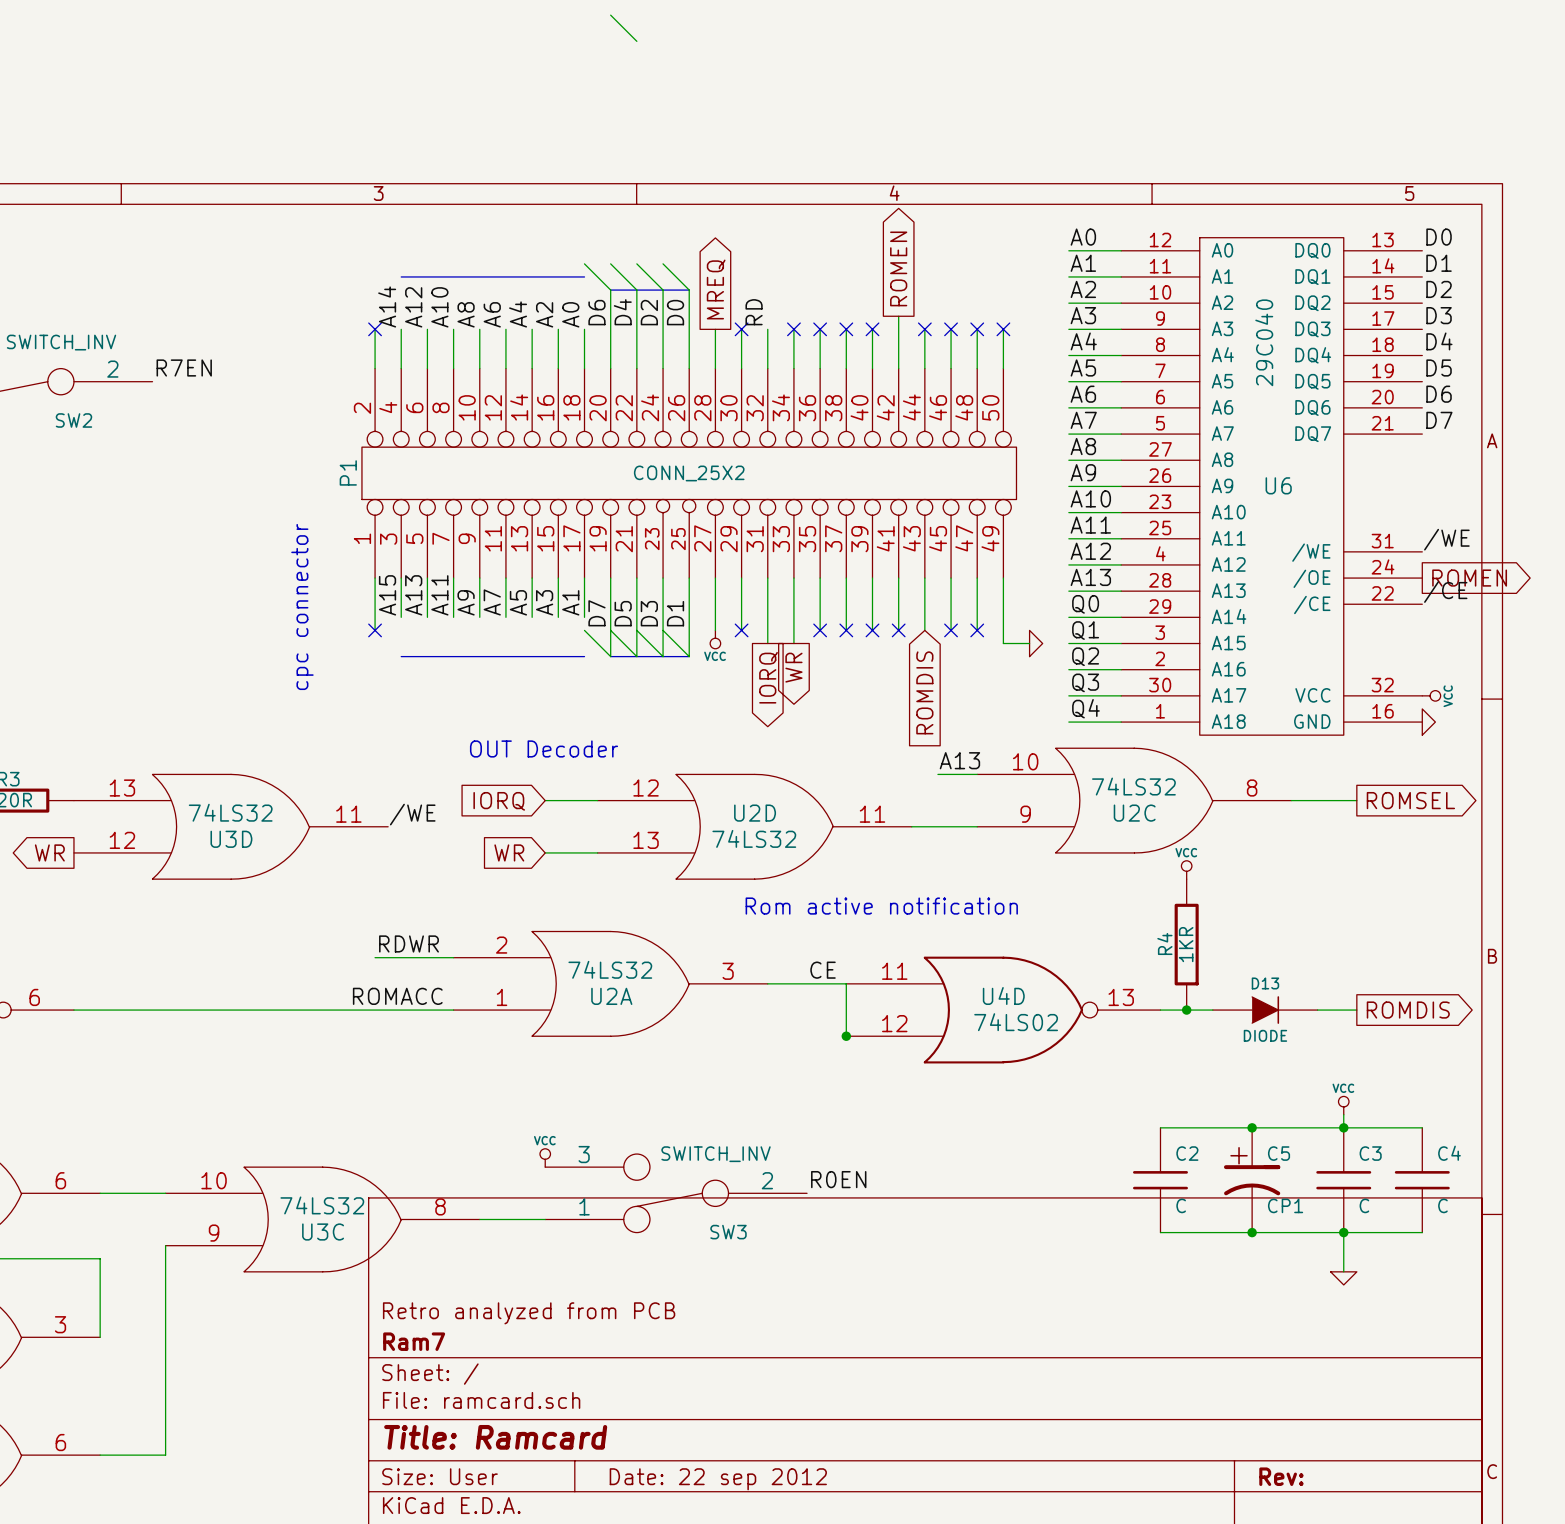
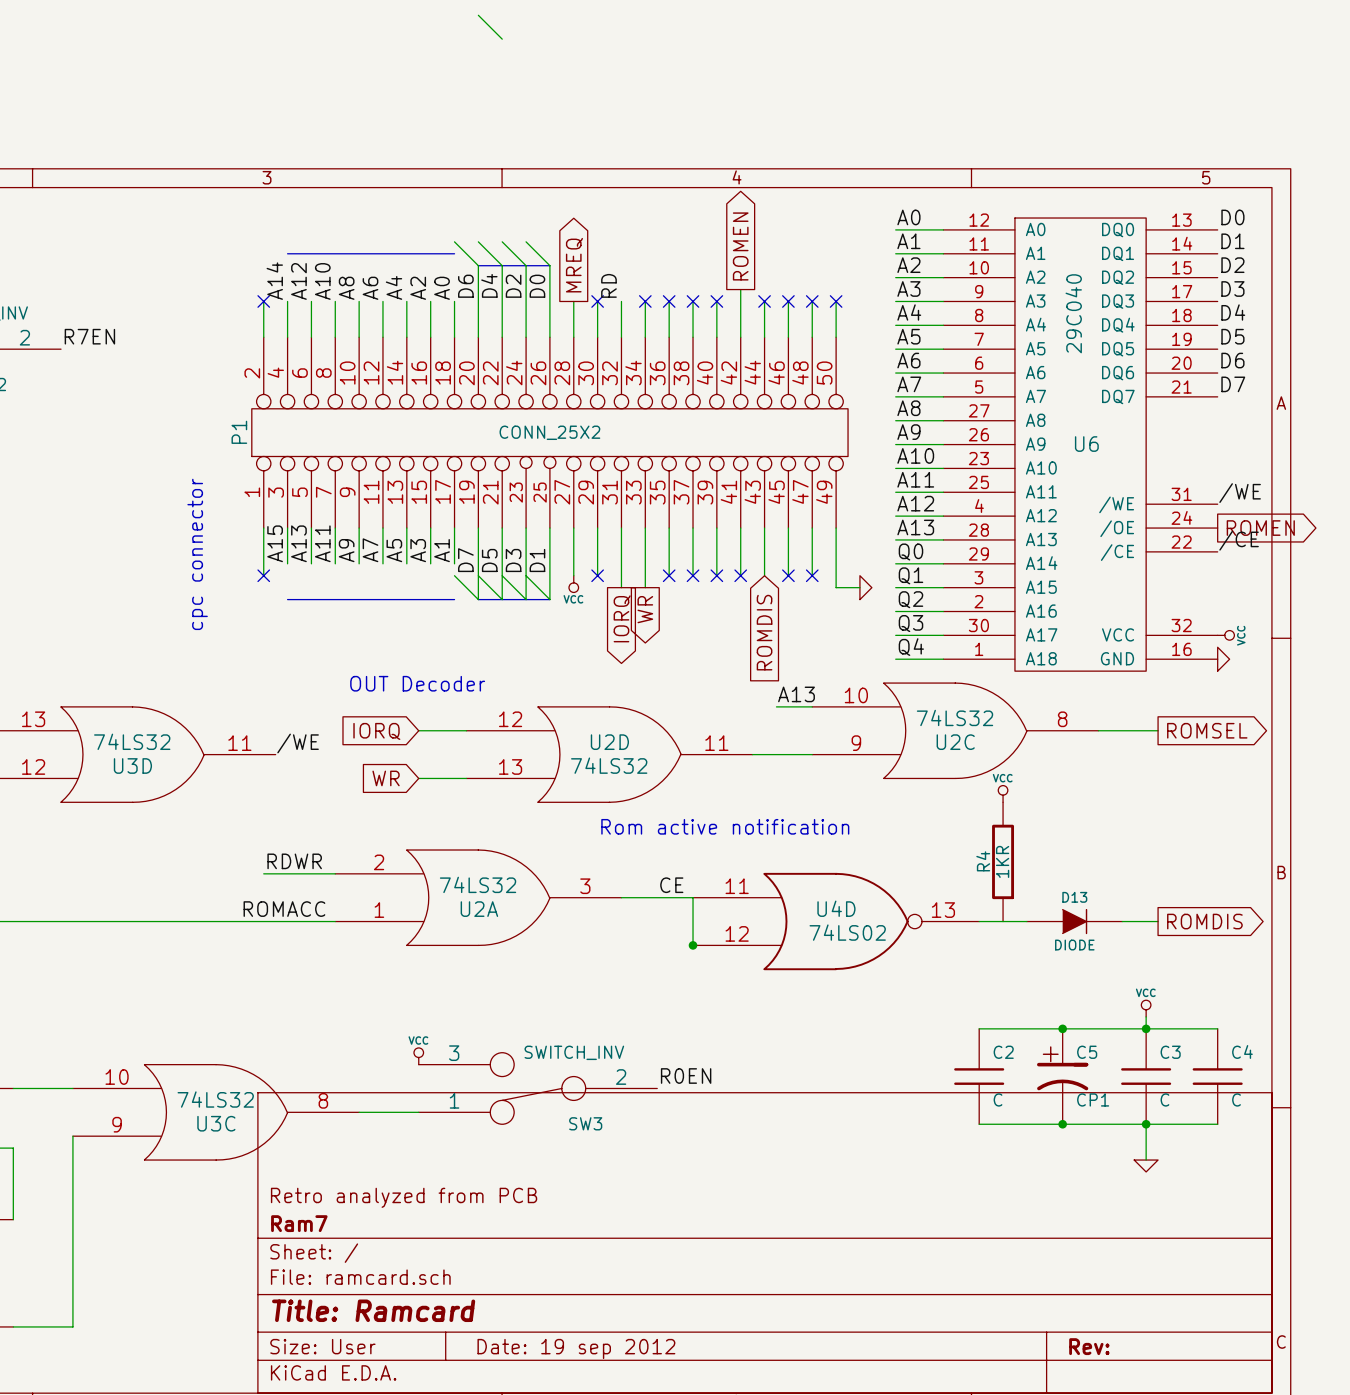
junction: (1186, 1010) -> none
title block: Date: 22 sep 2012 (718, 1479) -> Date: 19 sep 2012 (576, 1348)

